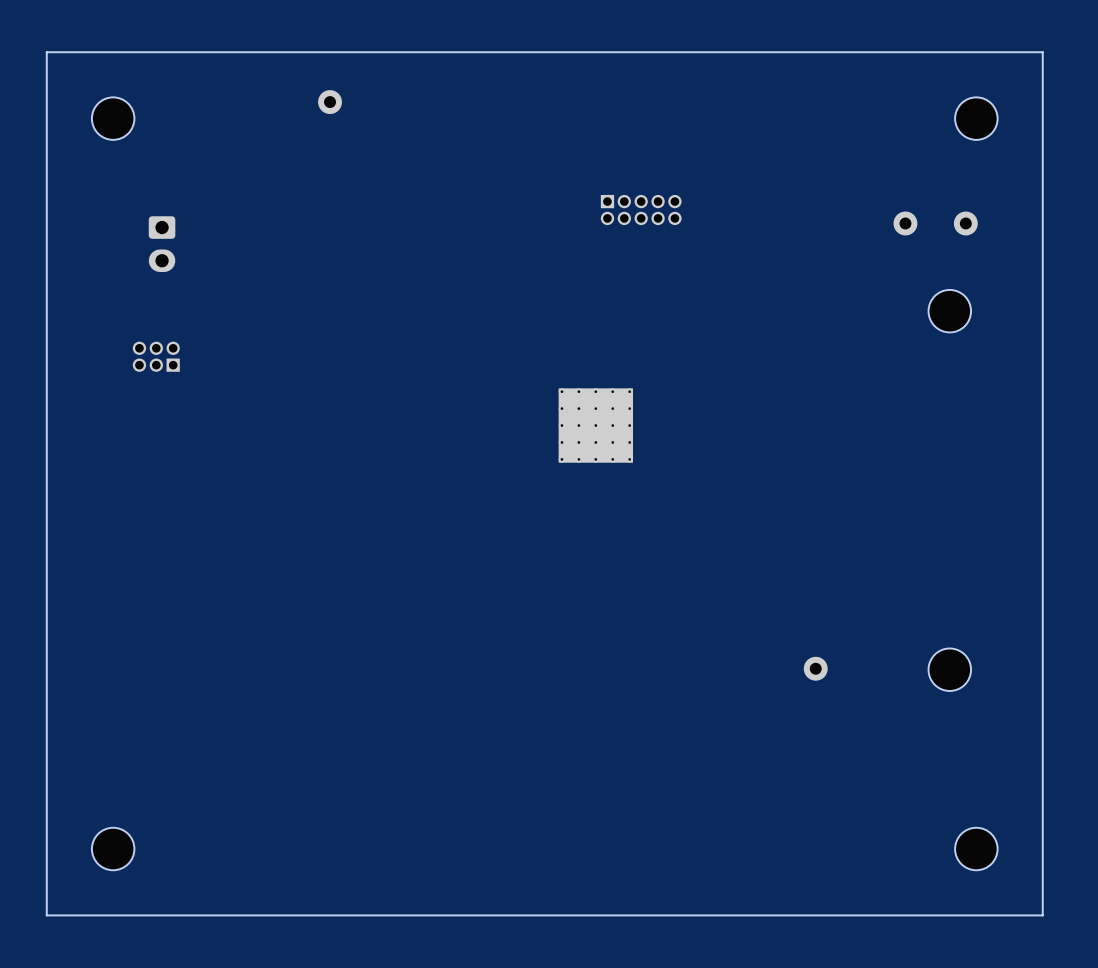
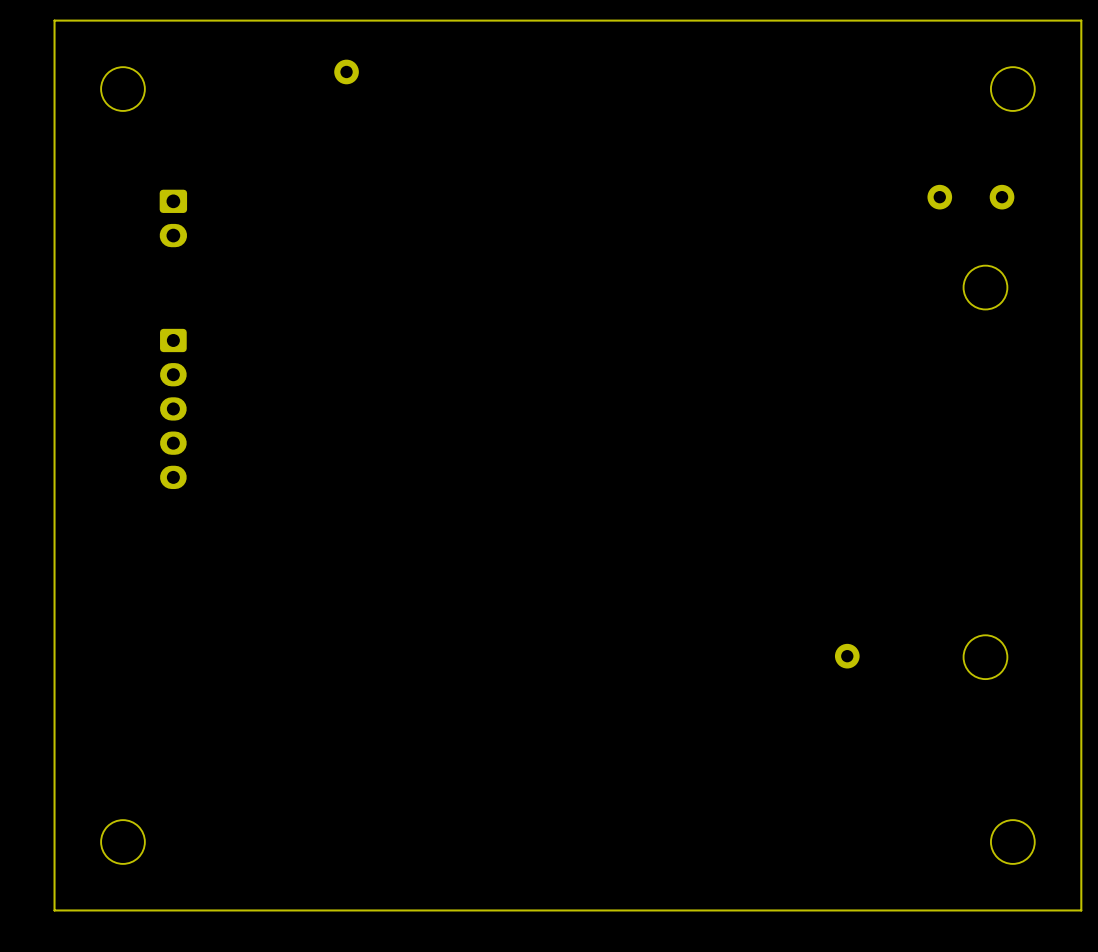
part: (641, 210) -> none
part: (156, 356) -> none
part: (595, 425) -> none
part: none -> (173, 408)

